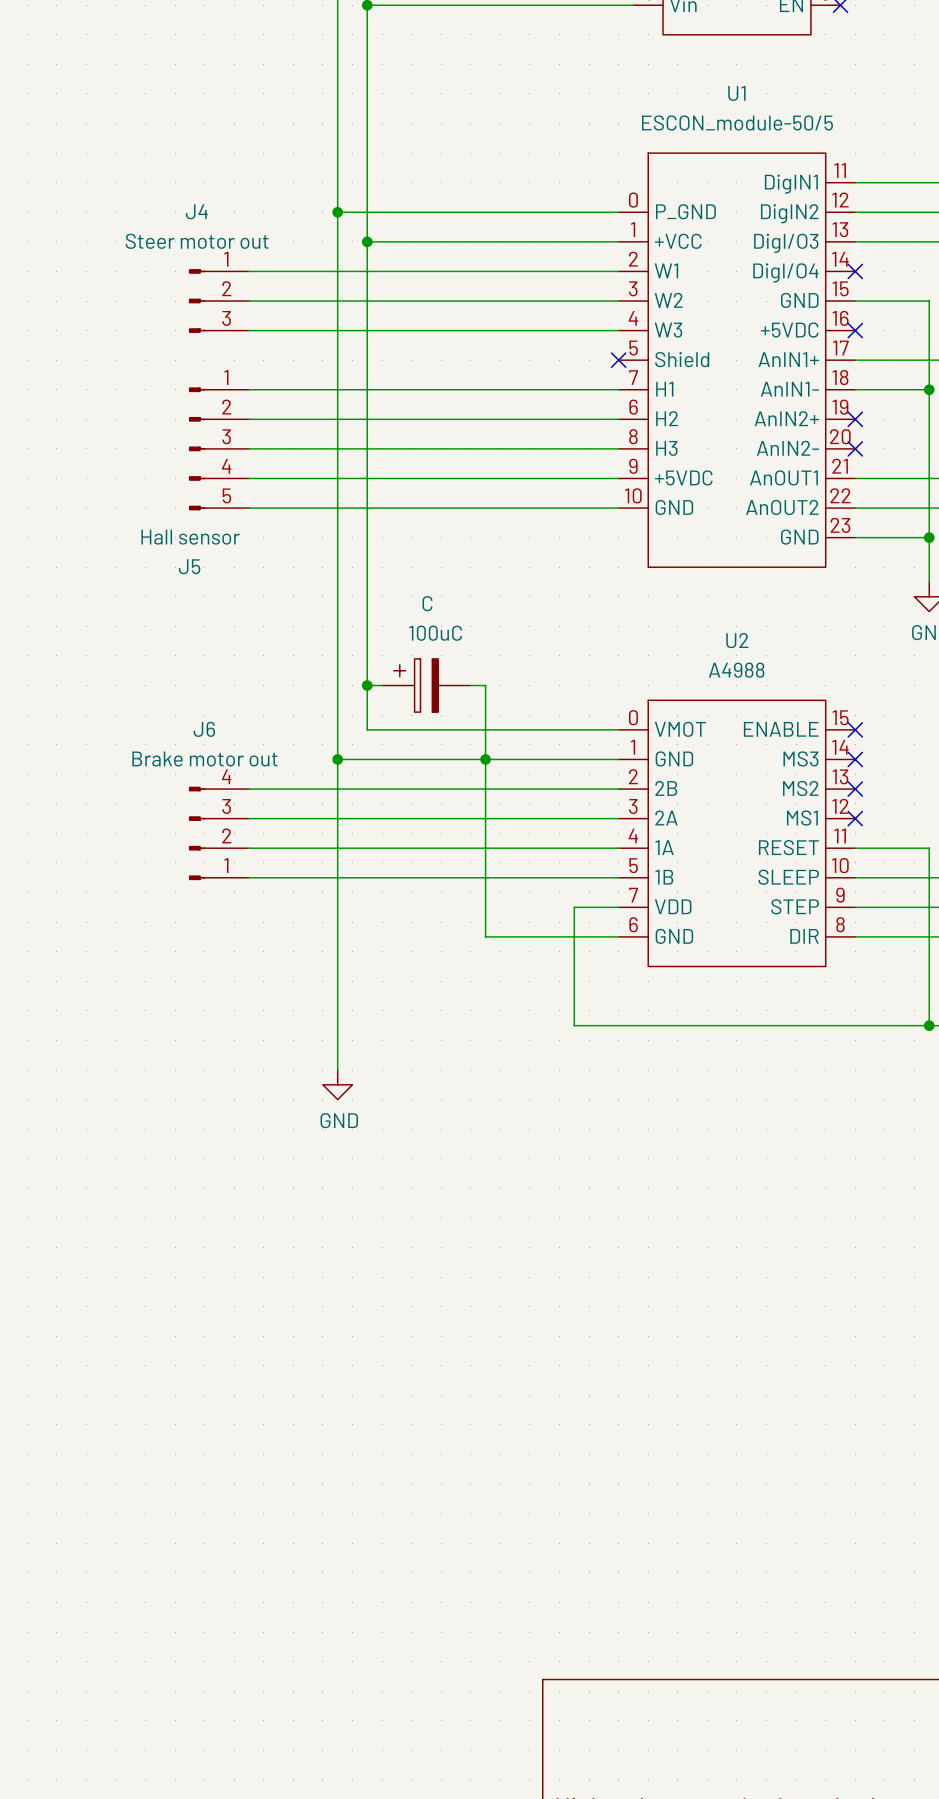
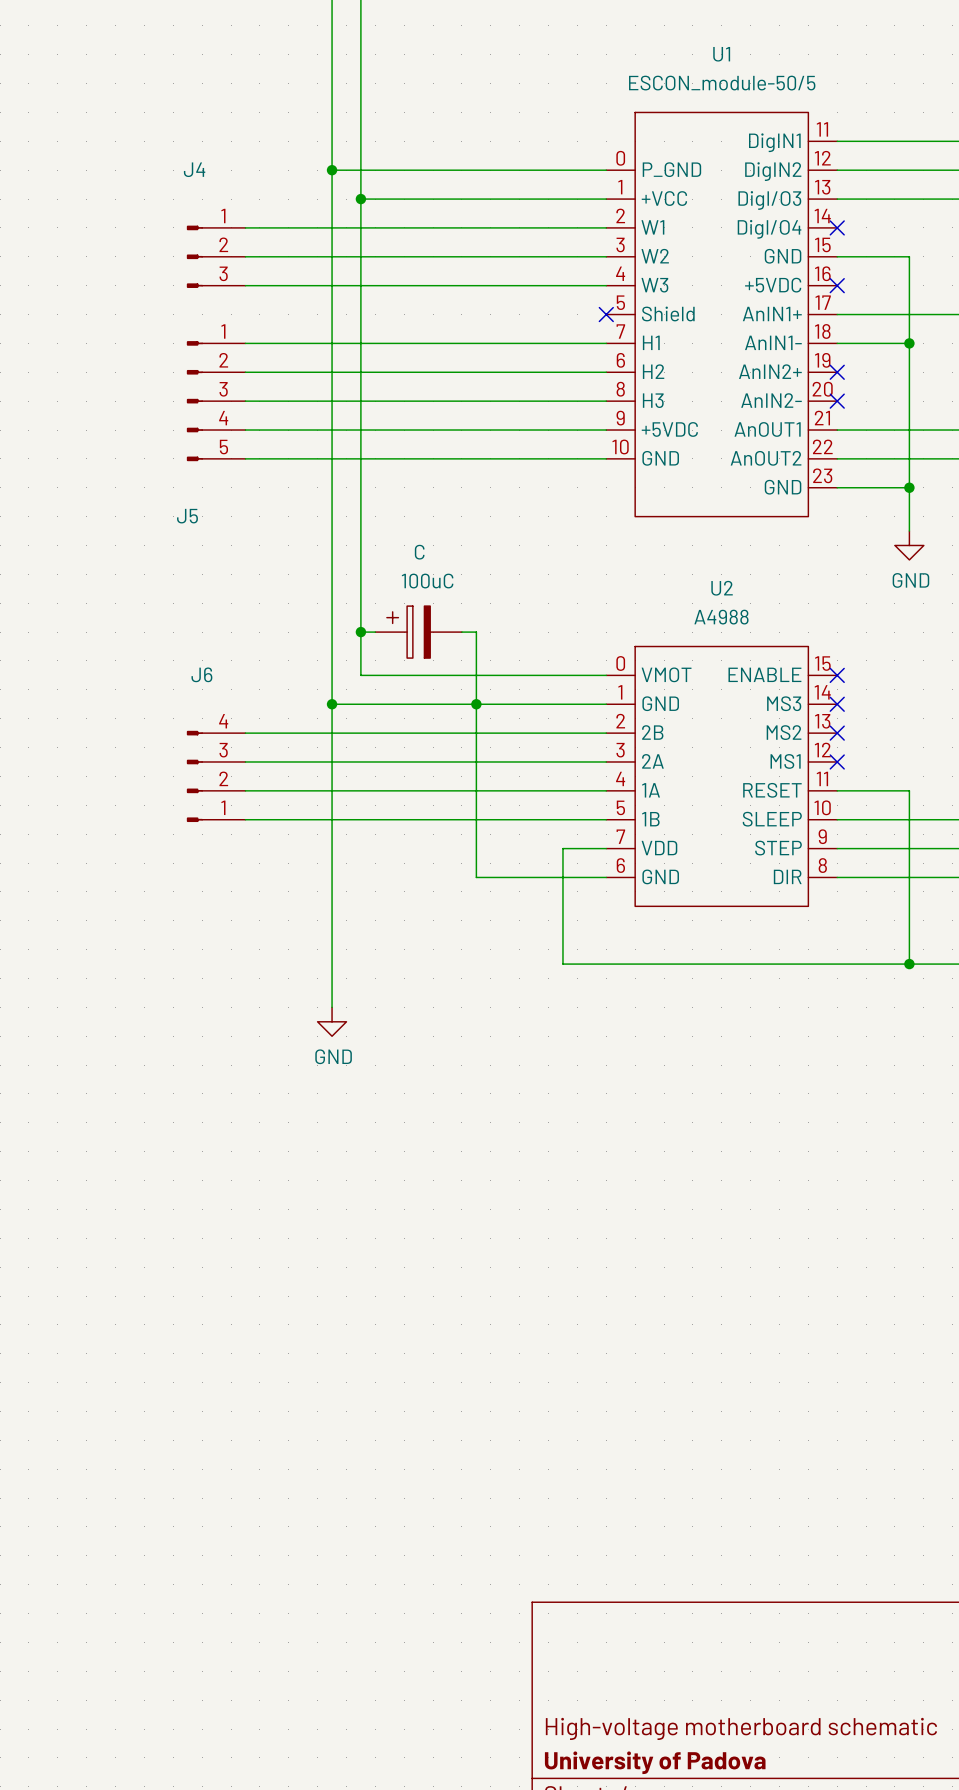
J4 value: Steer motor out (197, 241) -> none
J5 value: Hall sensor (190, 537) -> none
J6 value: Brake motor out (204, 759) -> none

